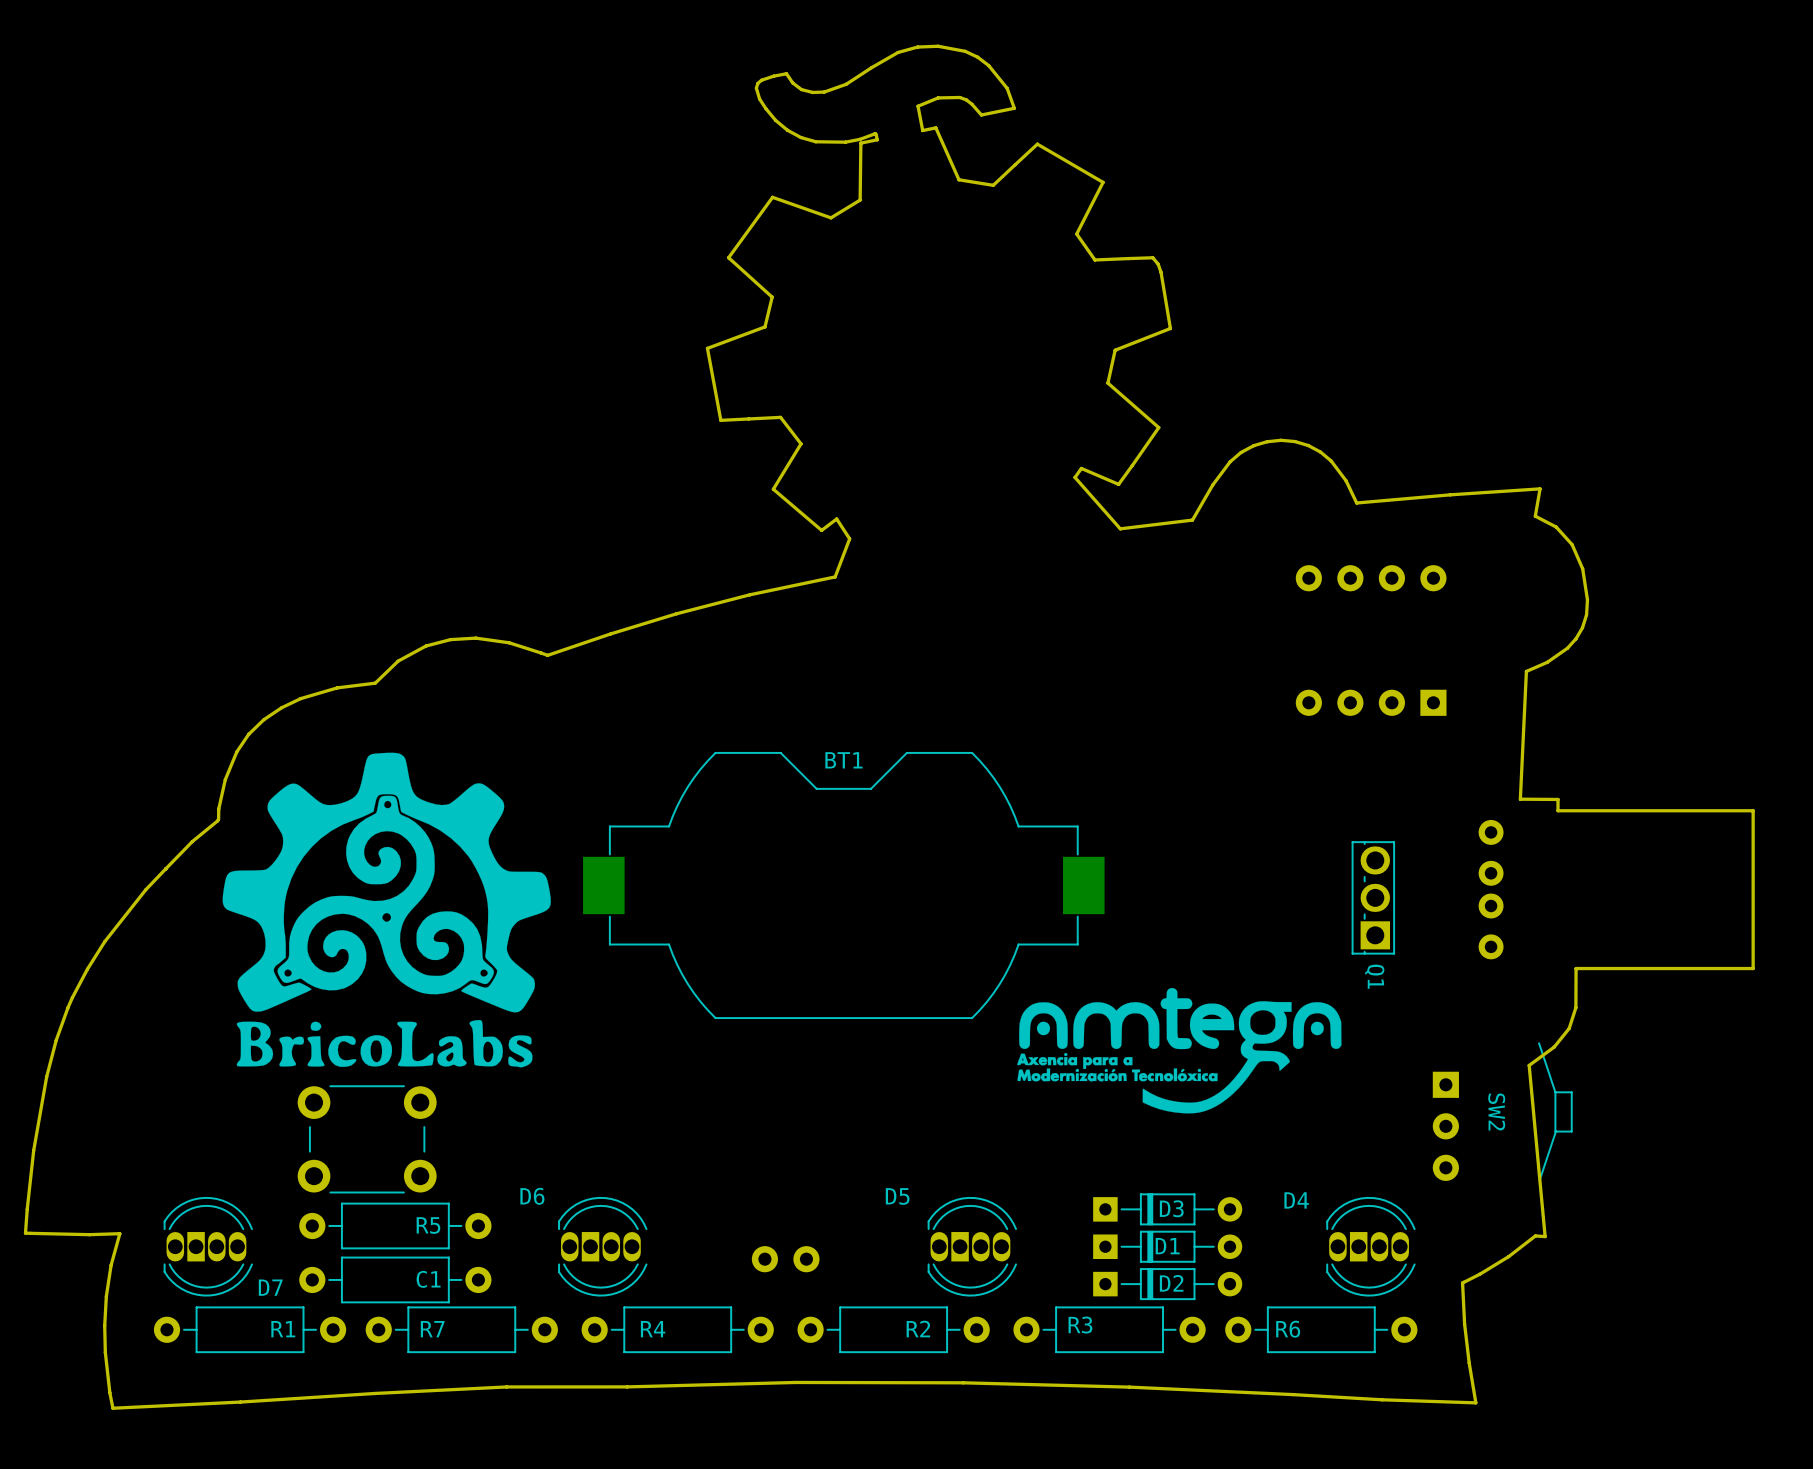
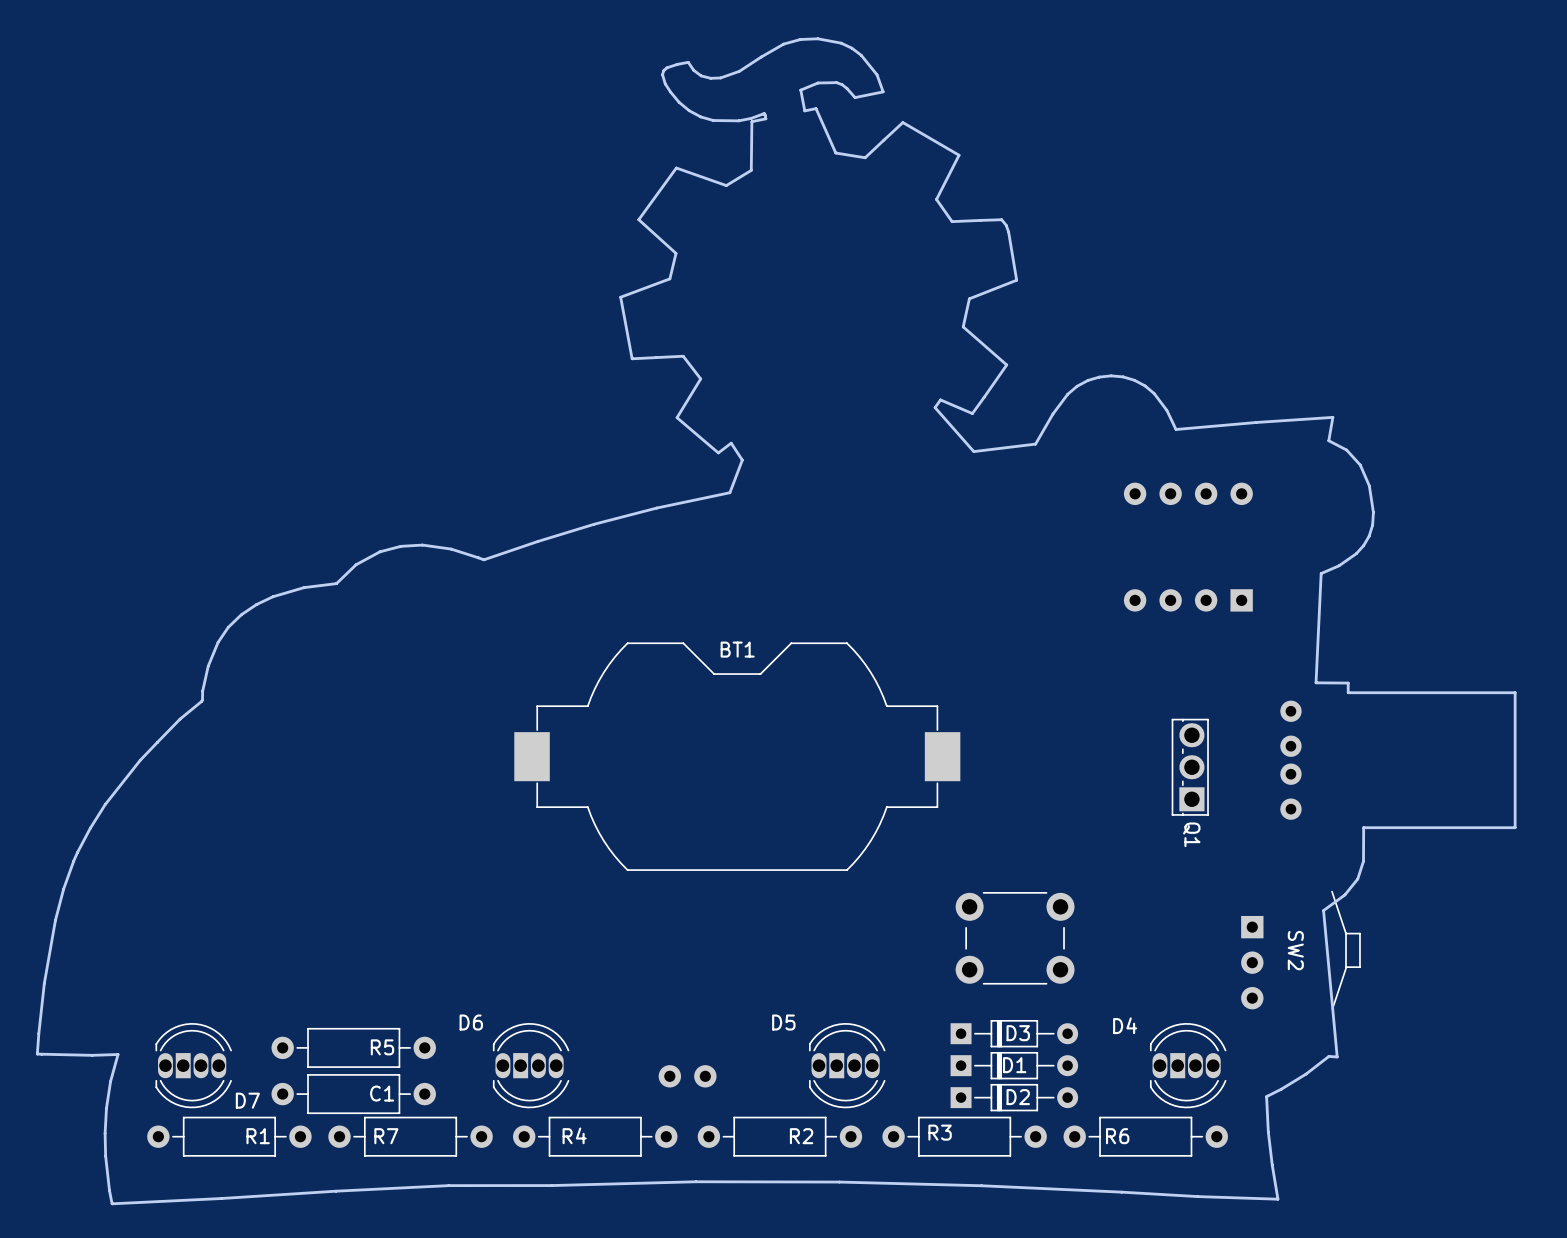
drawing: [222, 752, 551, 1068] -> none
drawing: [1017, 988, 1342, 1114] -> none
part: none -> (1015, 938)
part: (367, 1139) -> none

